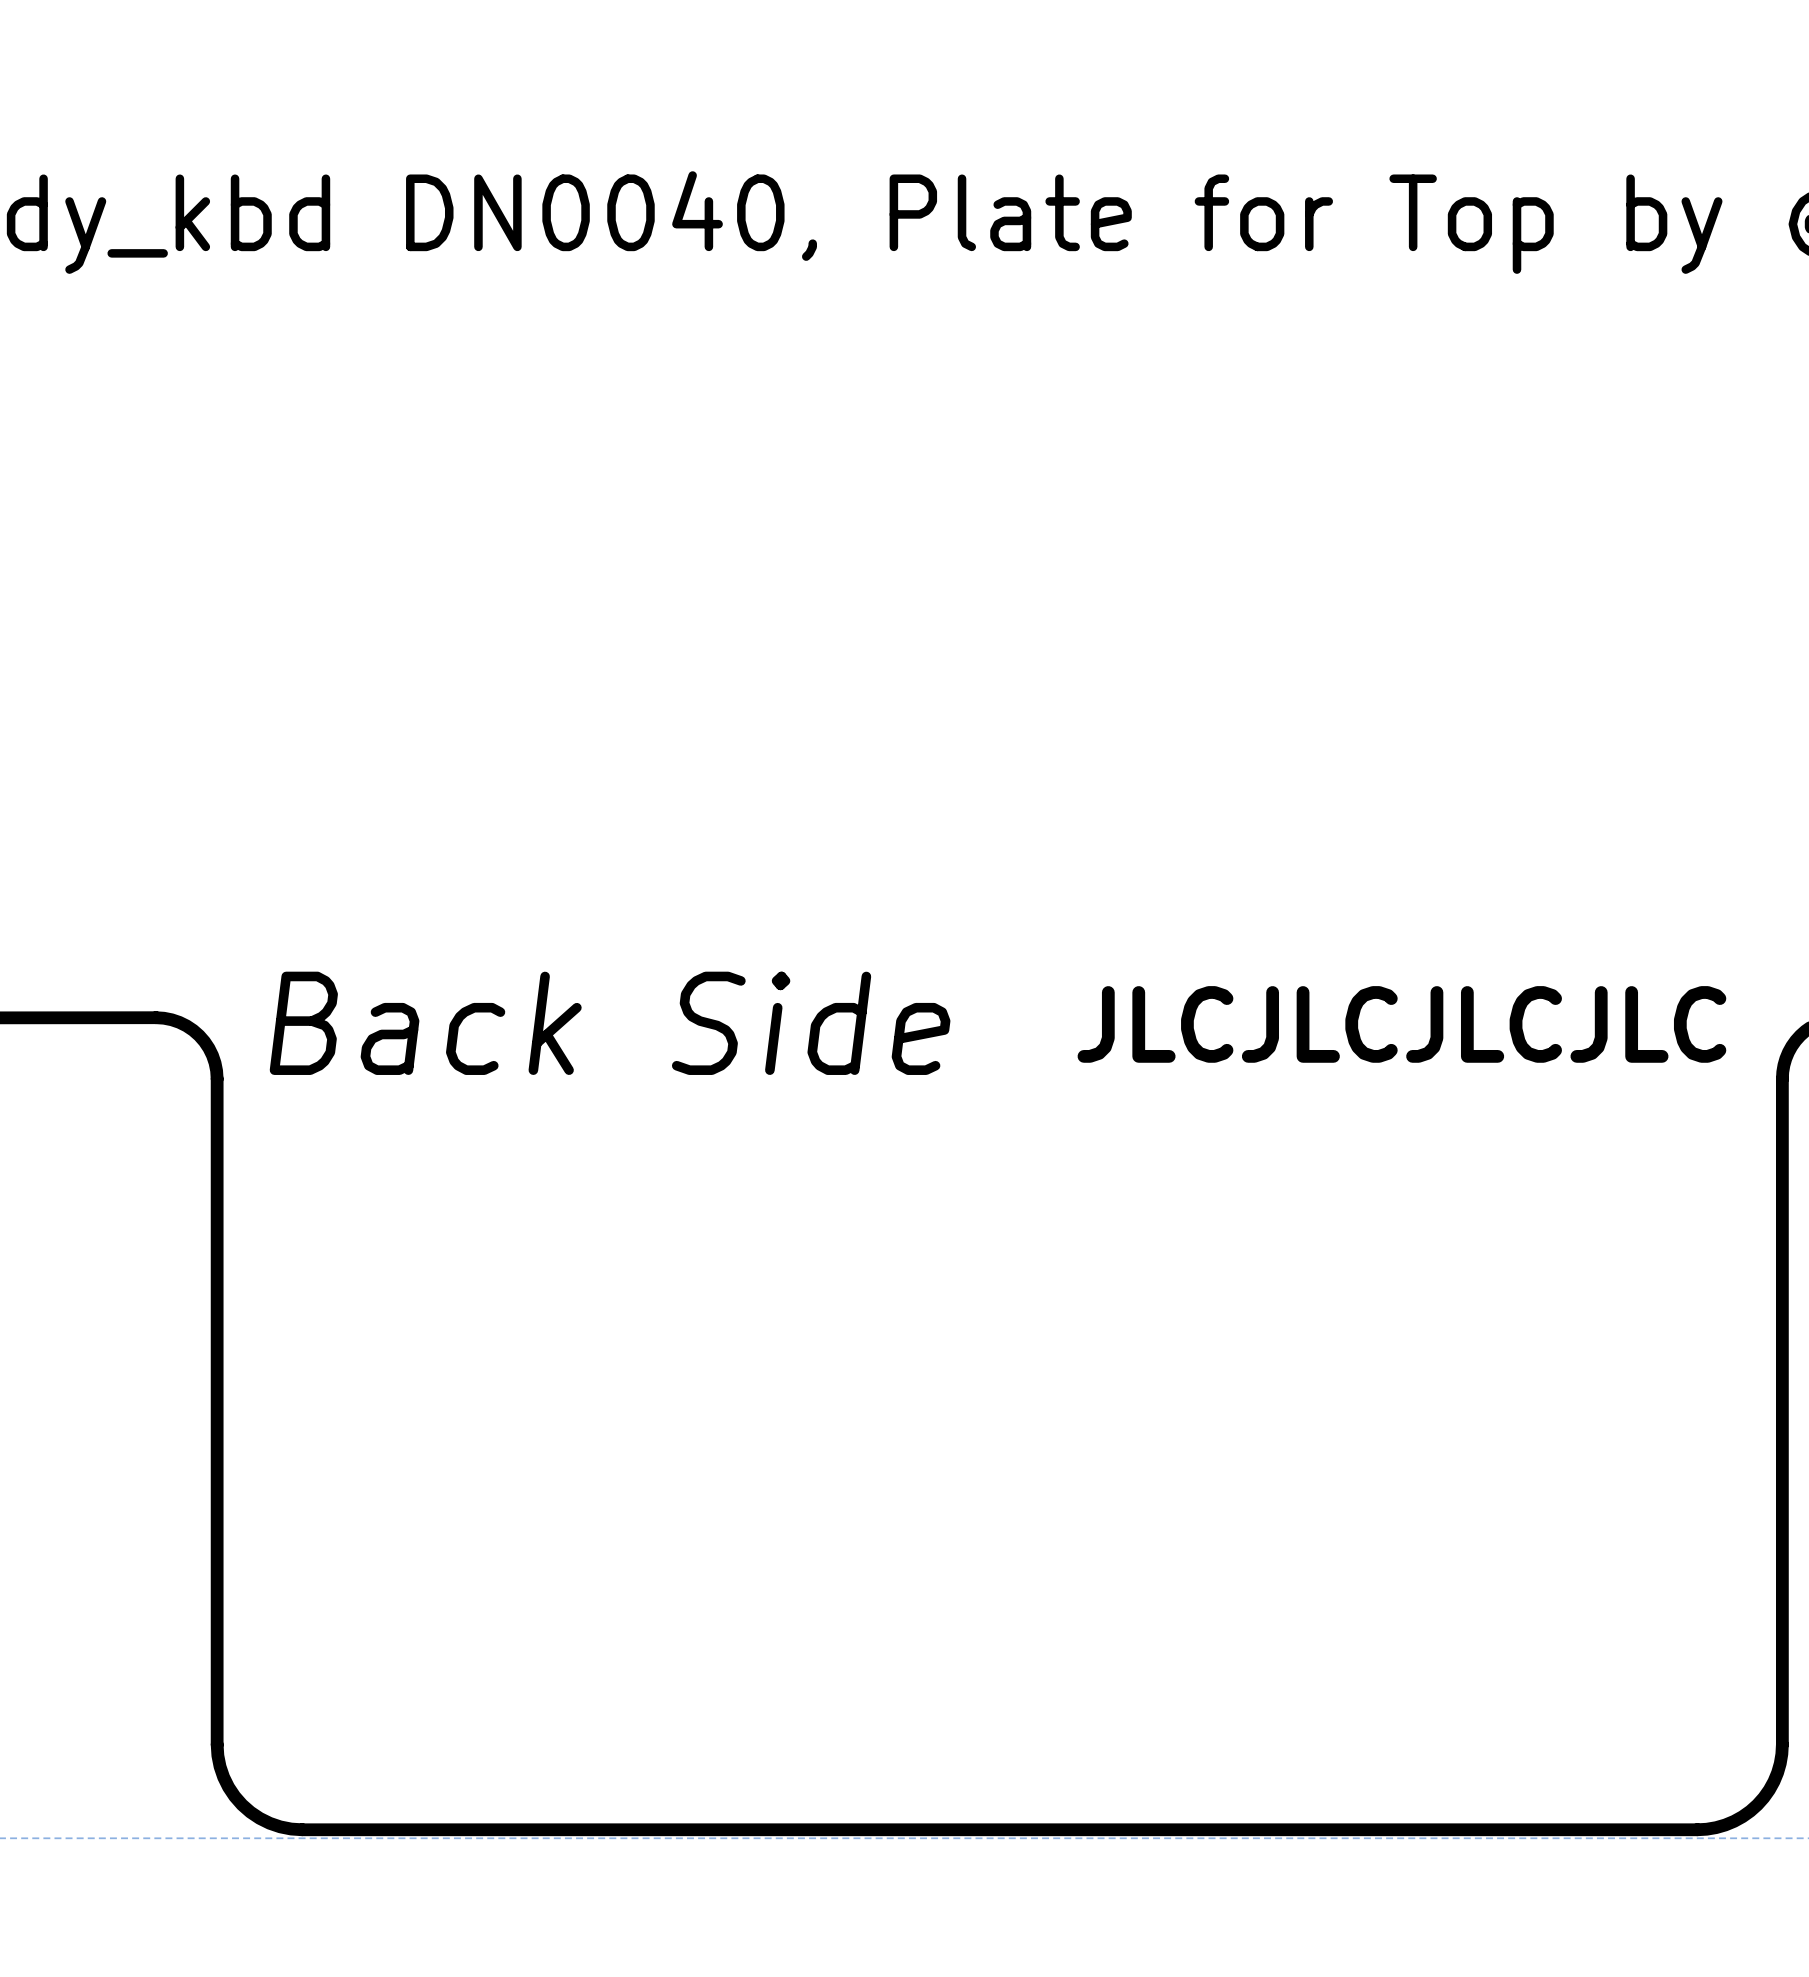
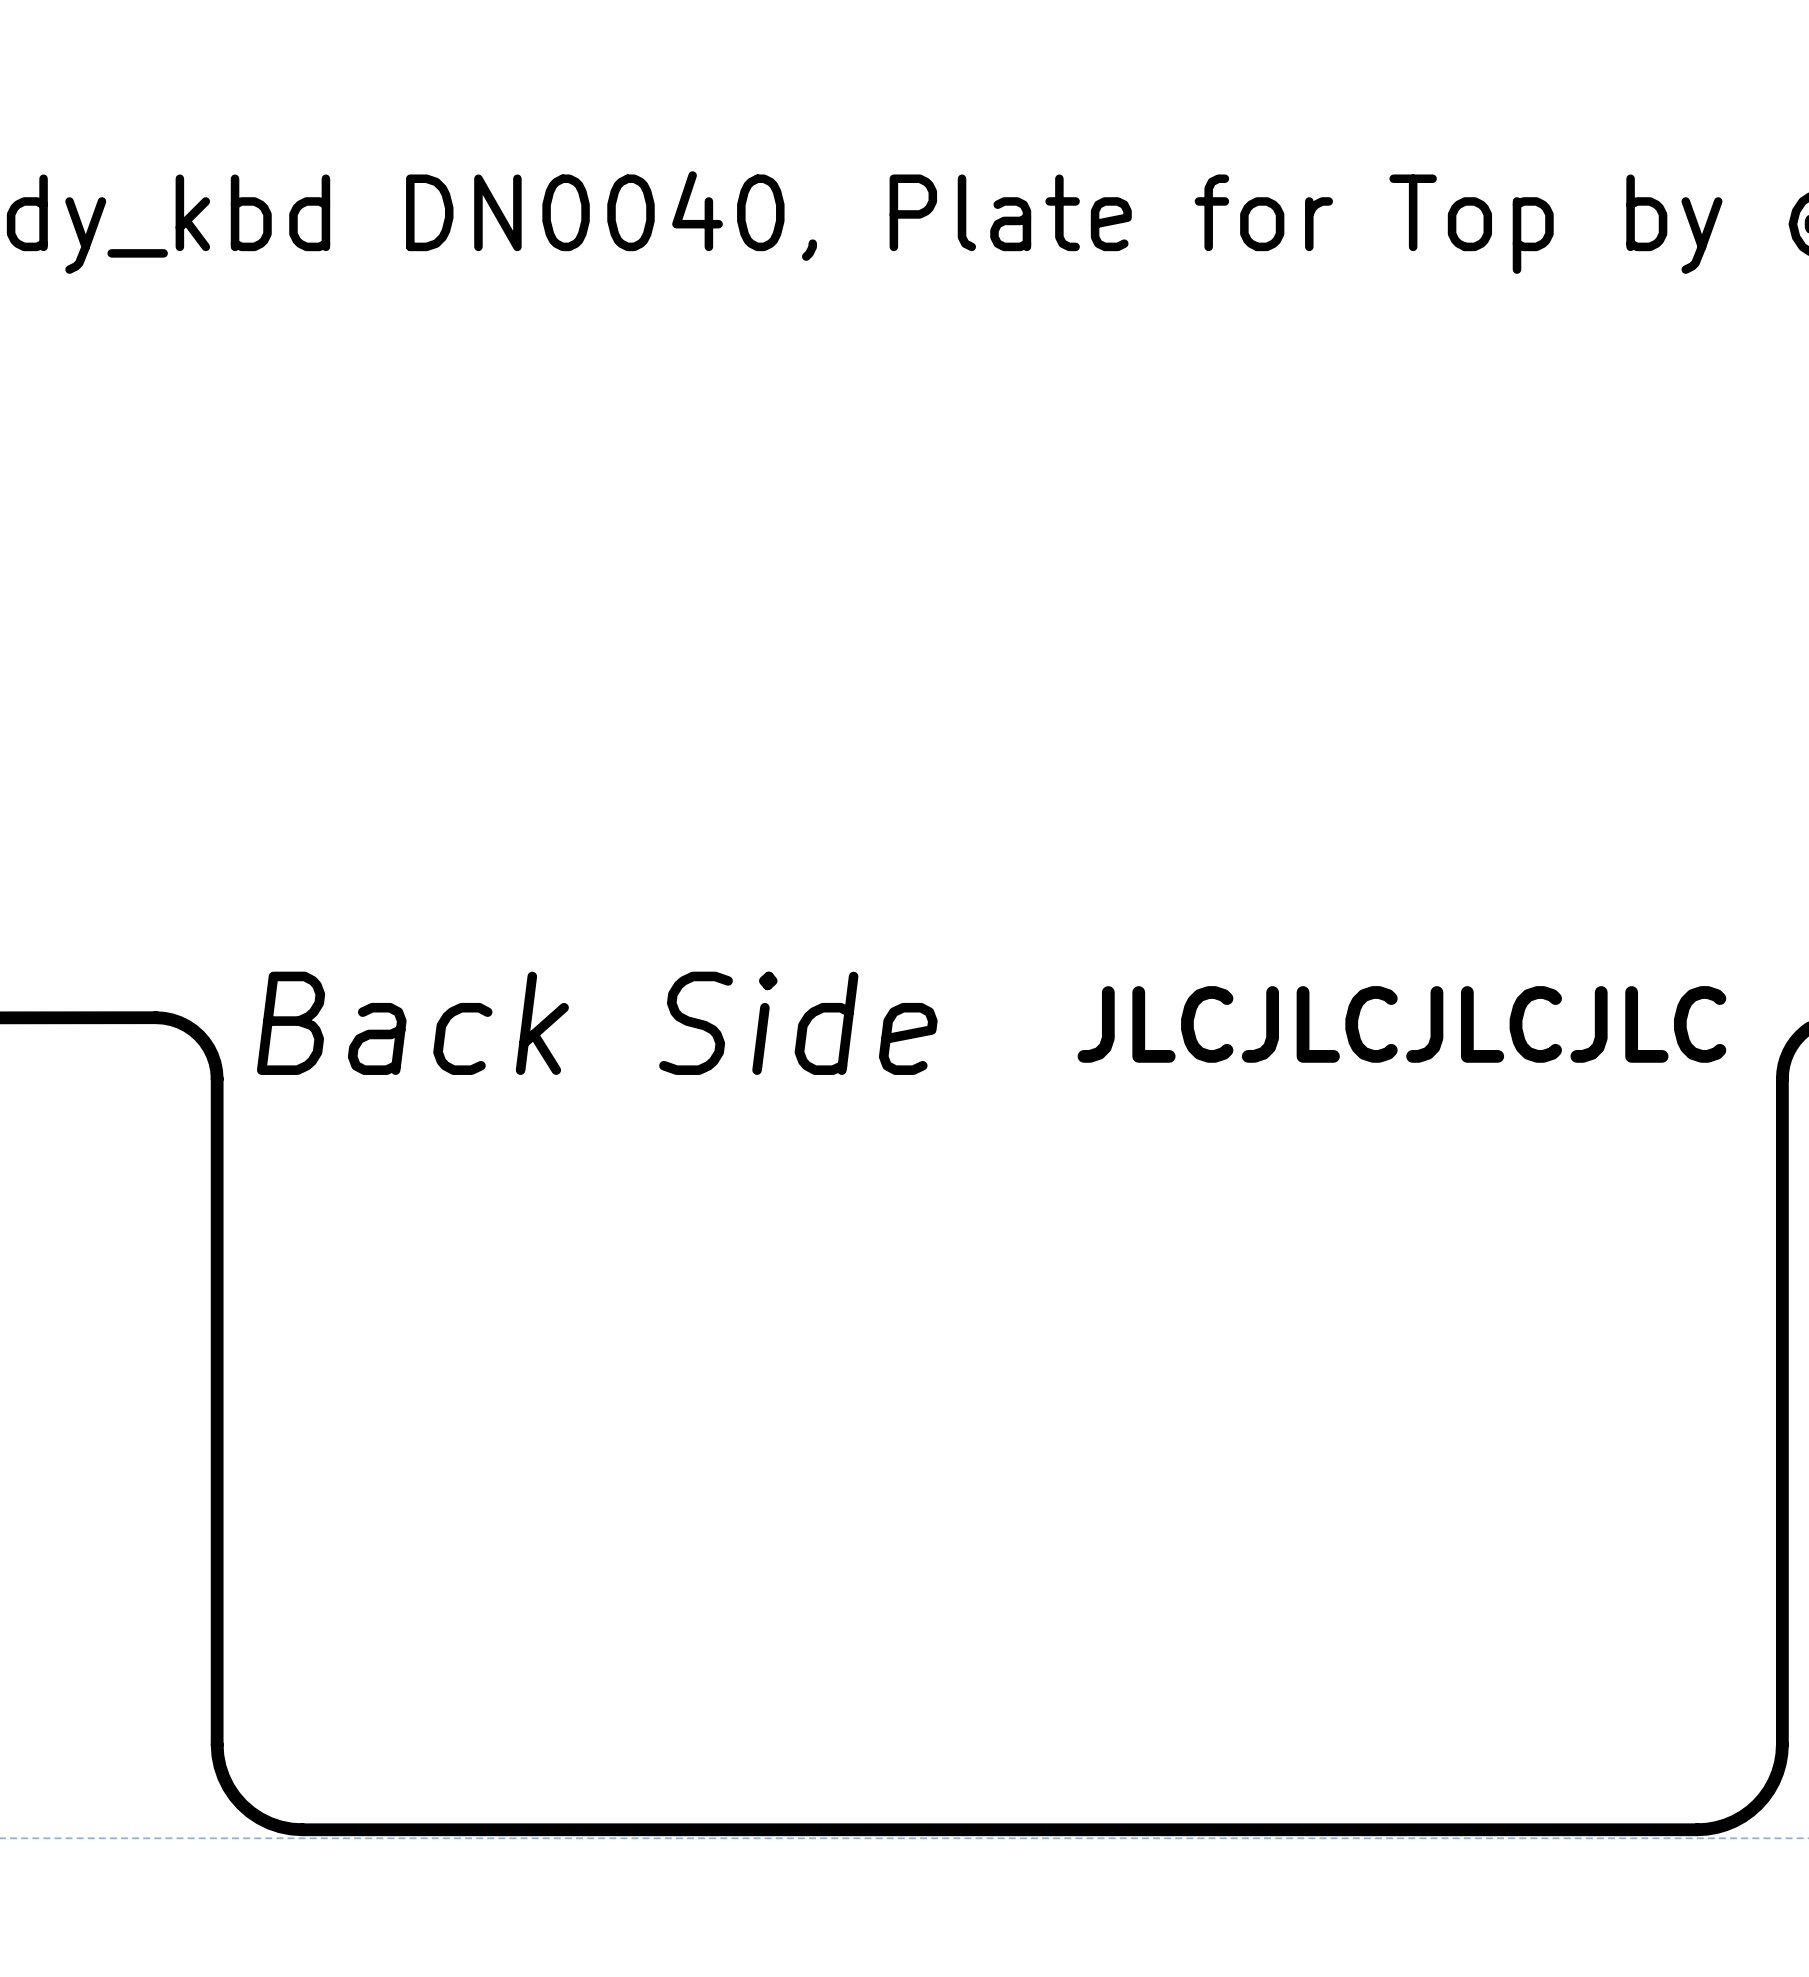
text position: Back Side (610, 1023) -> Back Side (597, 1023)

